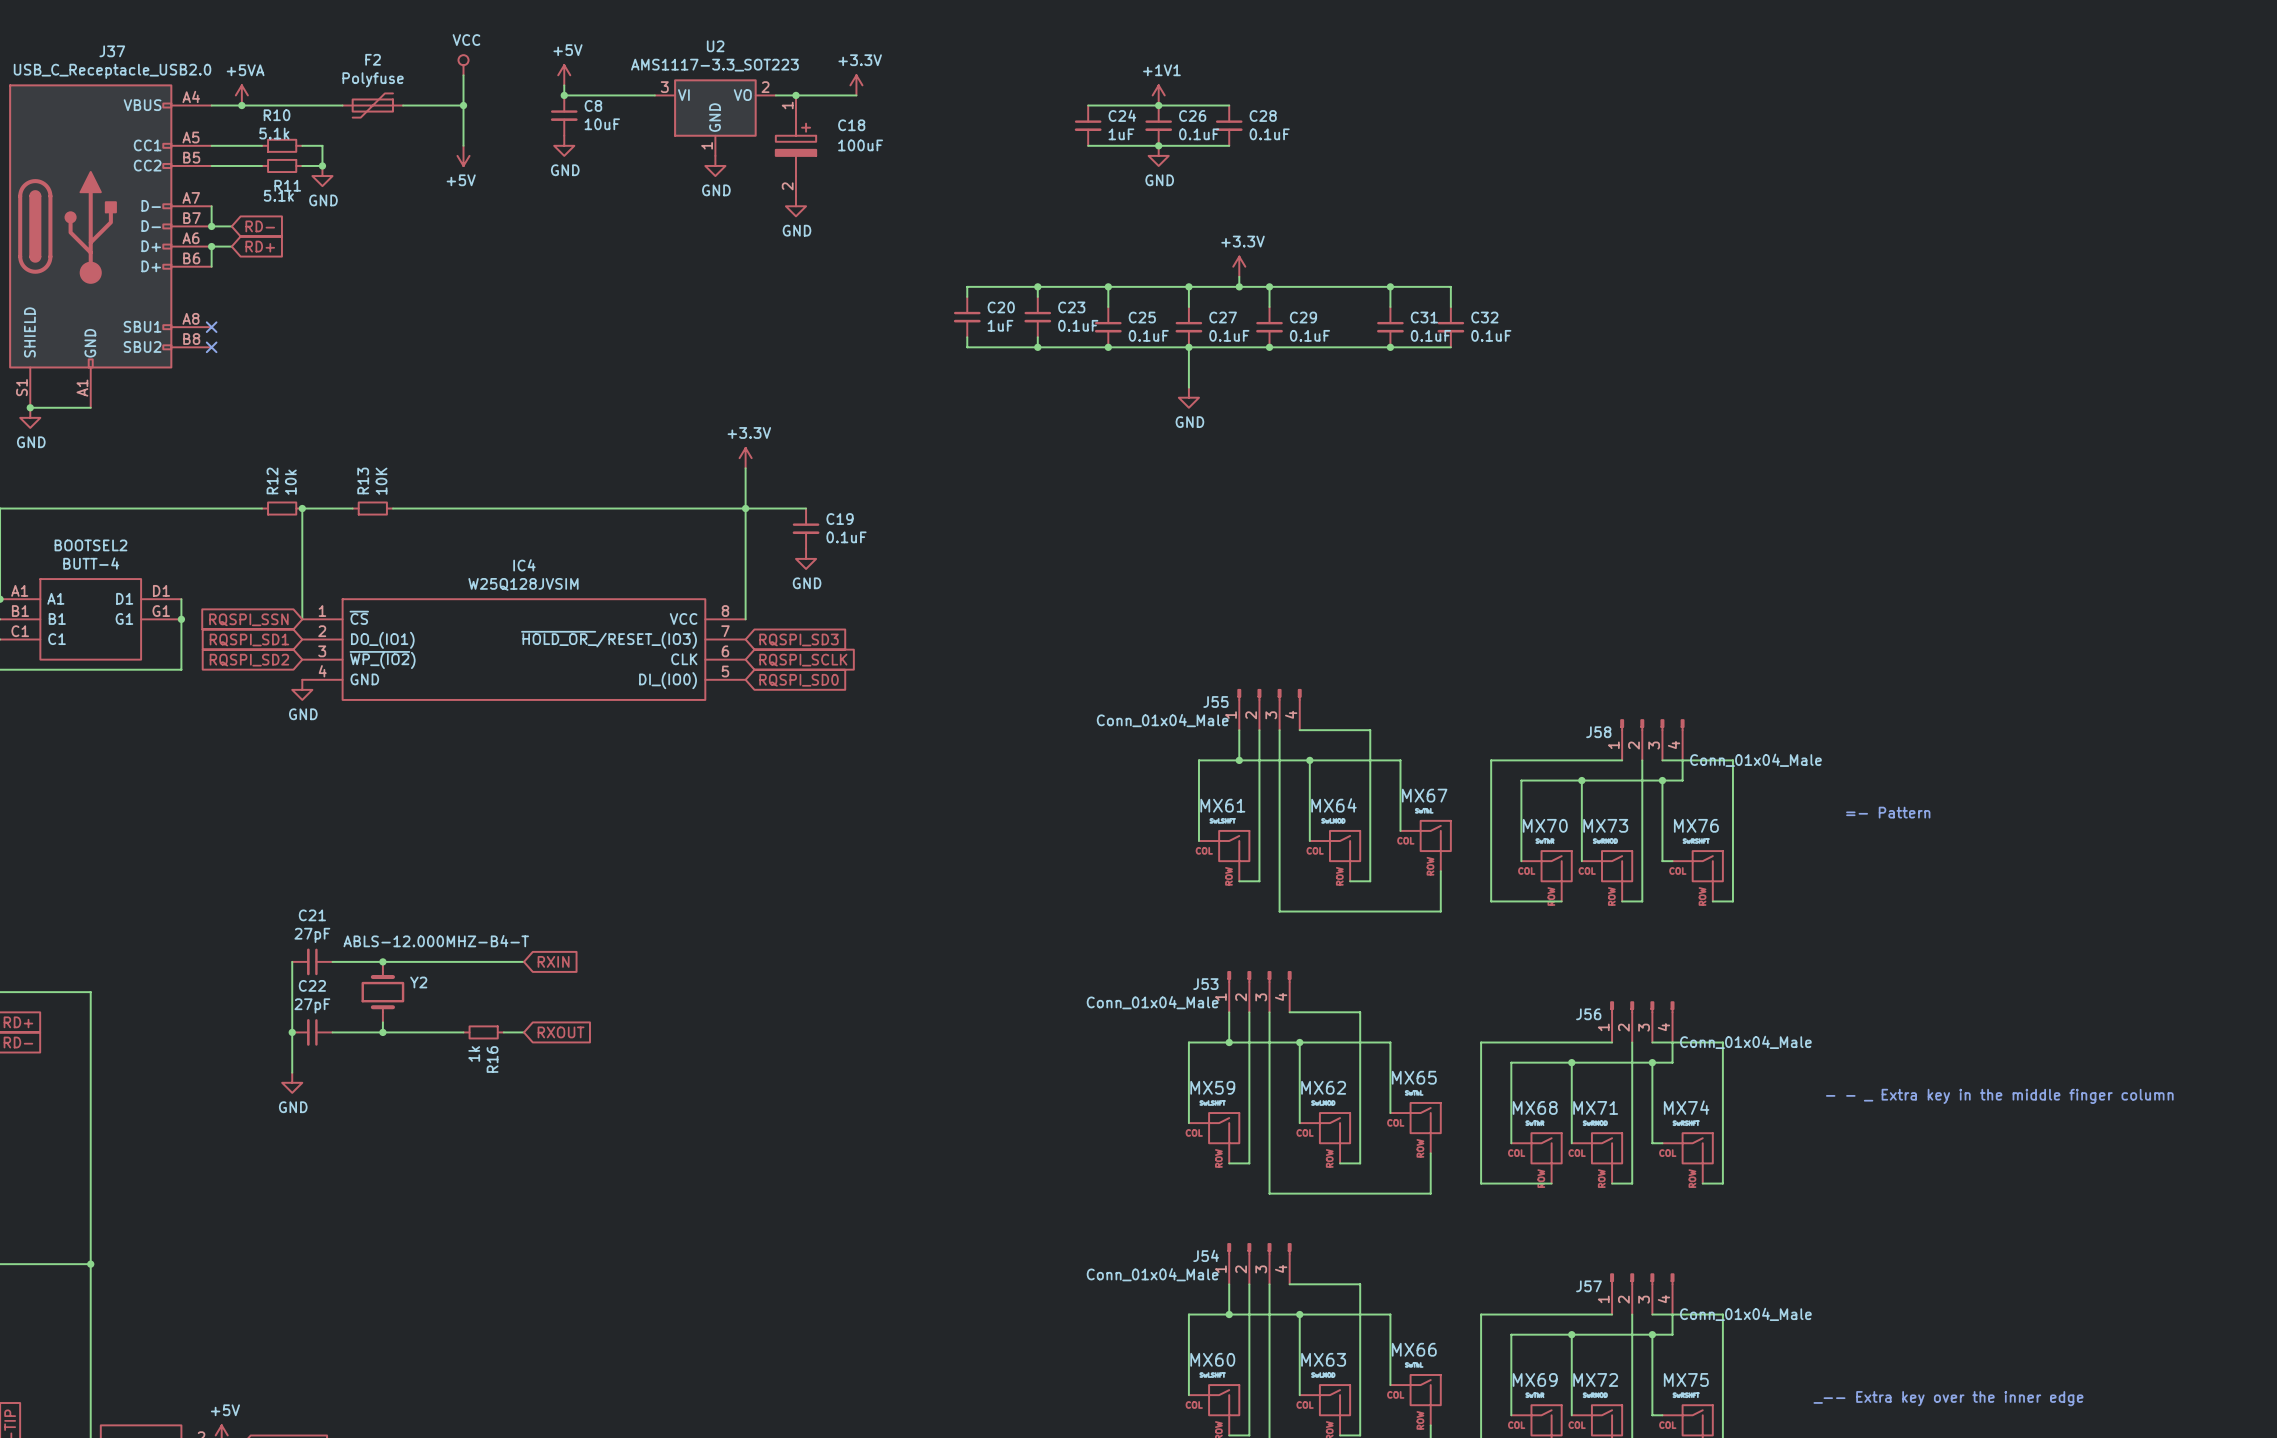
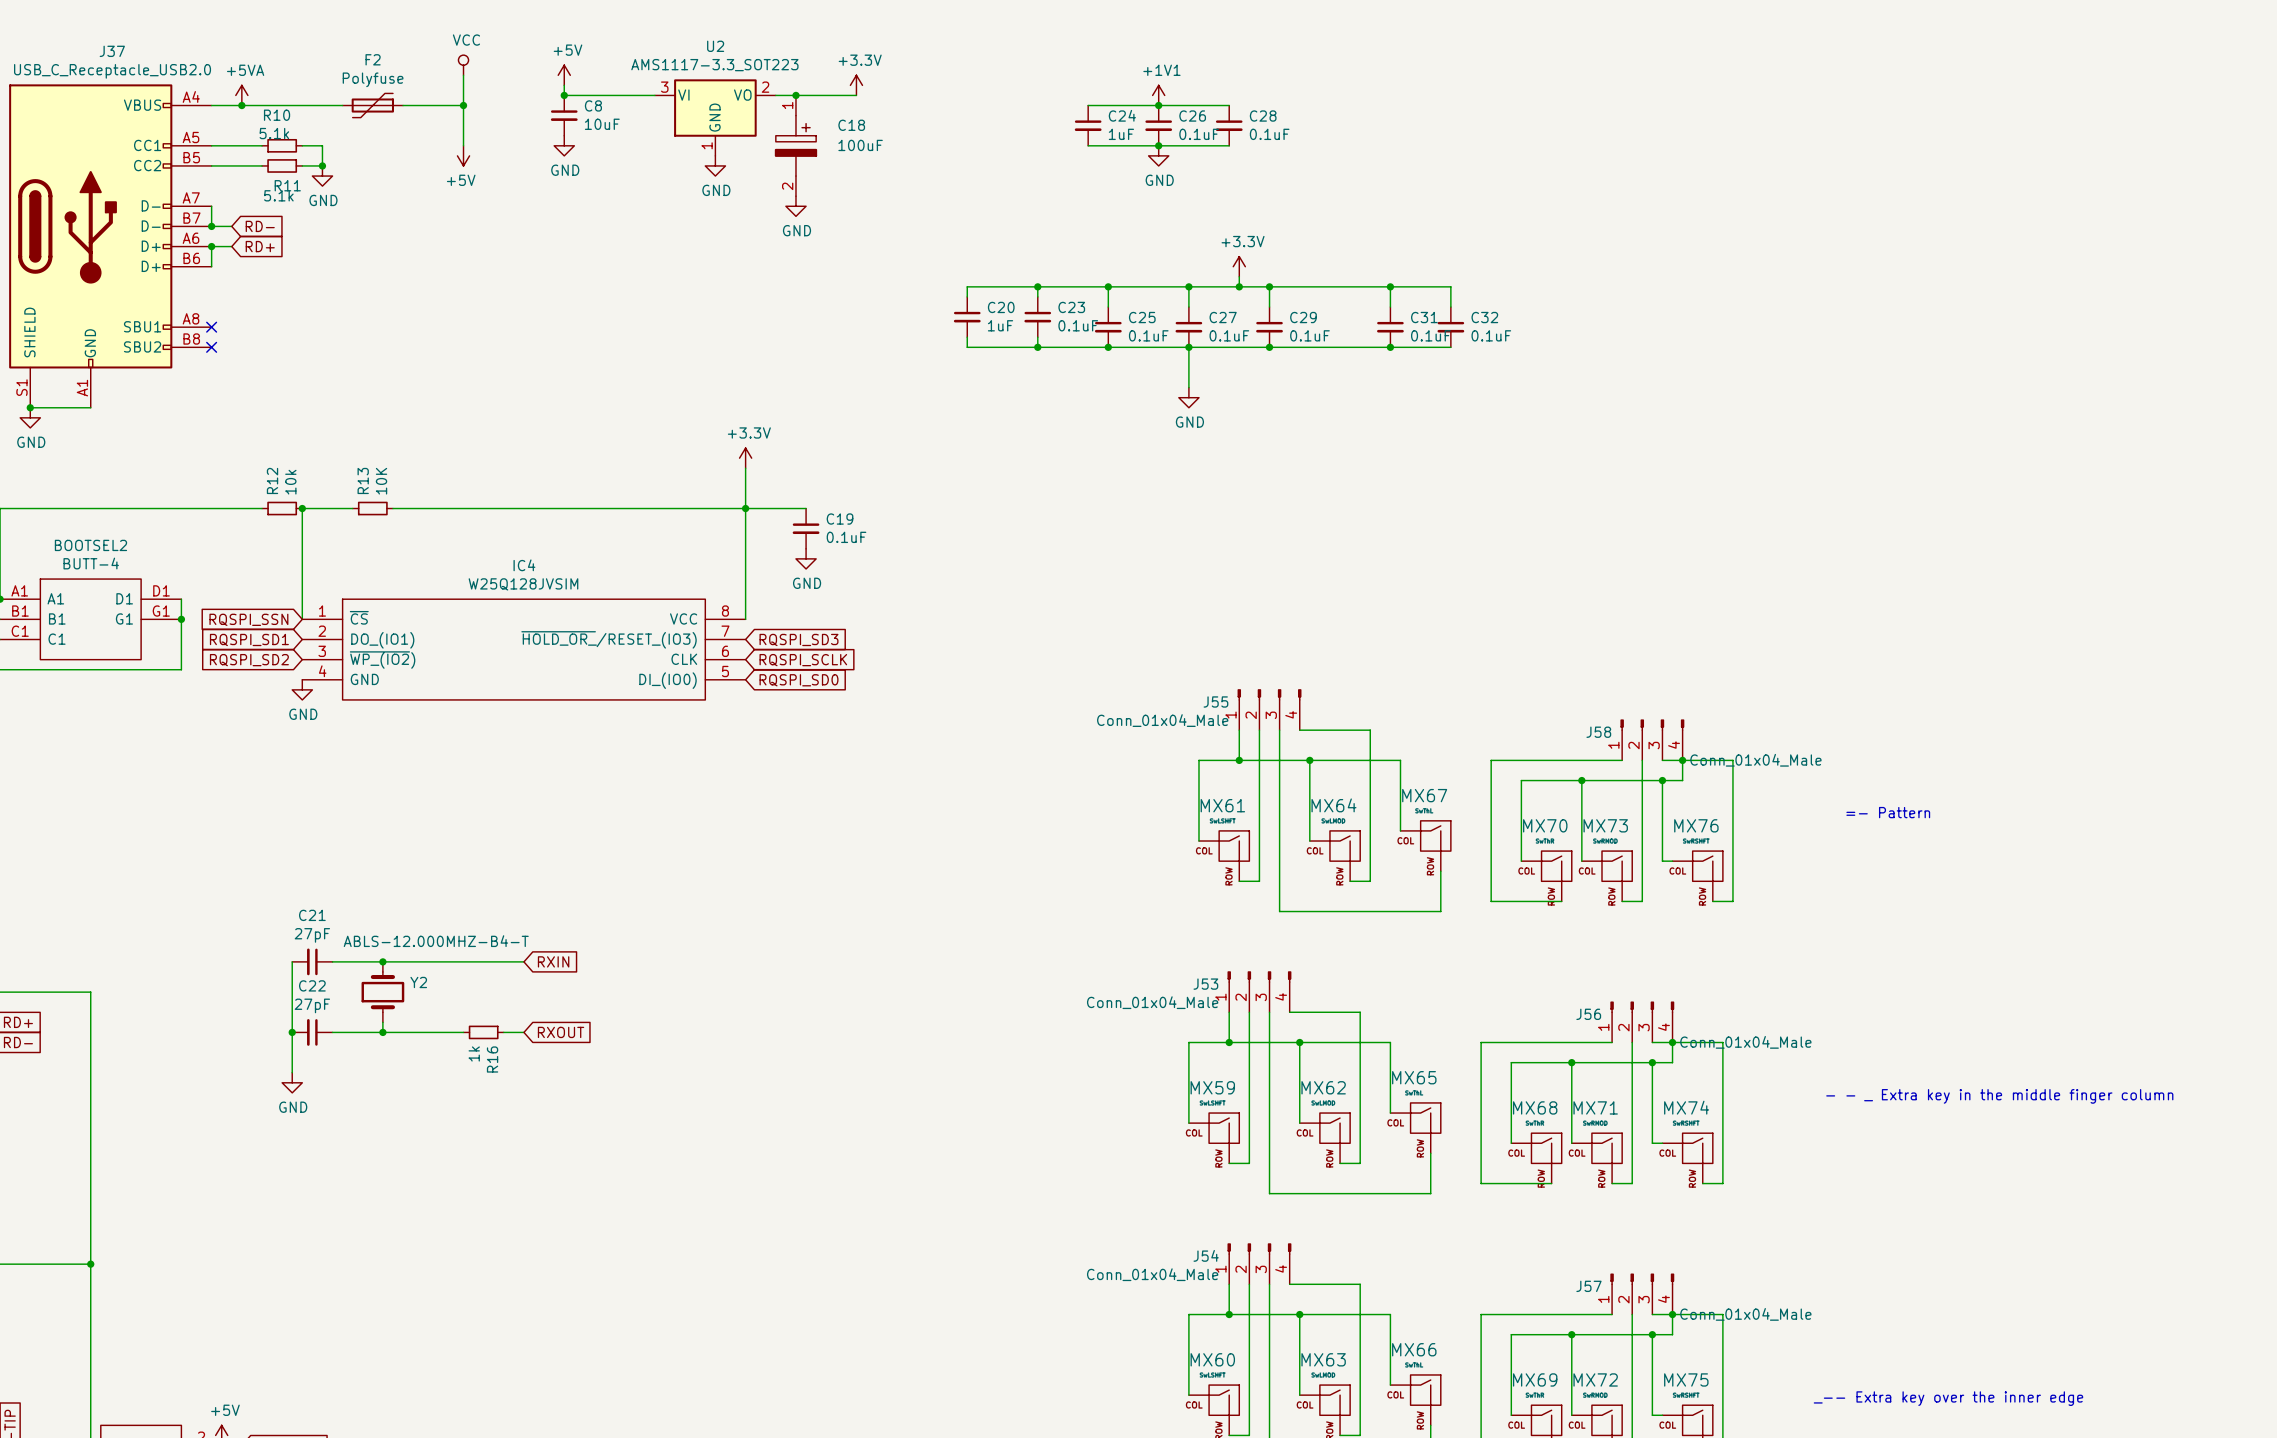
junction: none -> (1682, 760)
junction: none -> (1672, 1042)
junction: none -> (1672, 1314)

